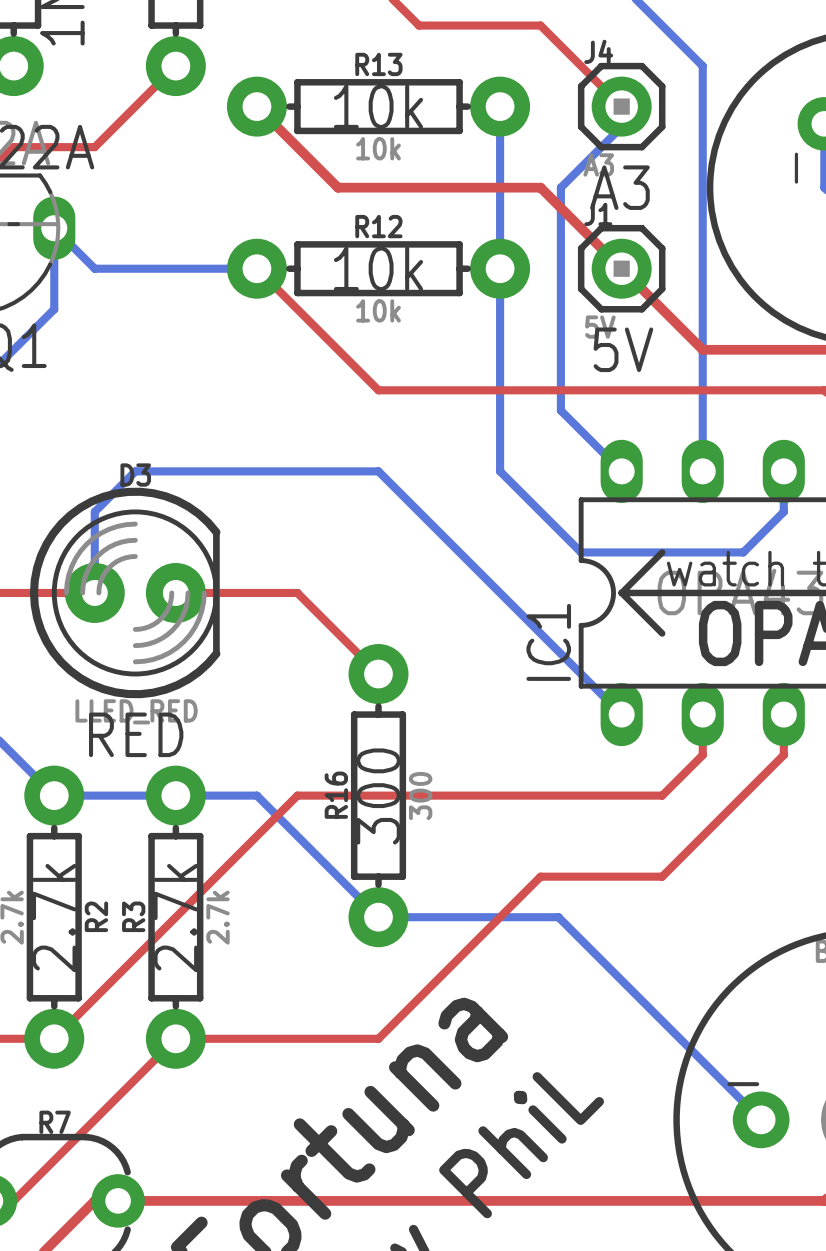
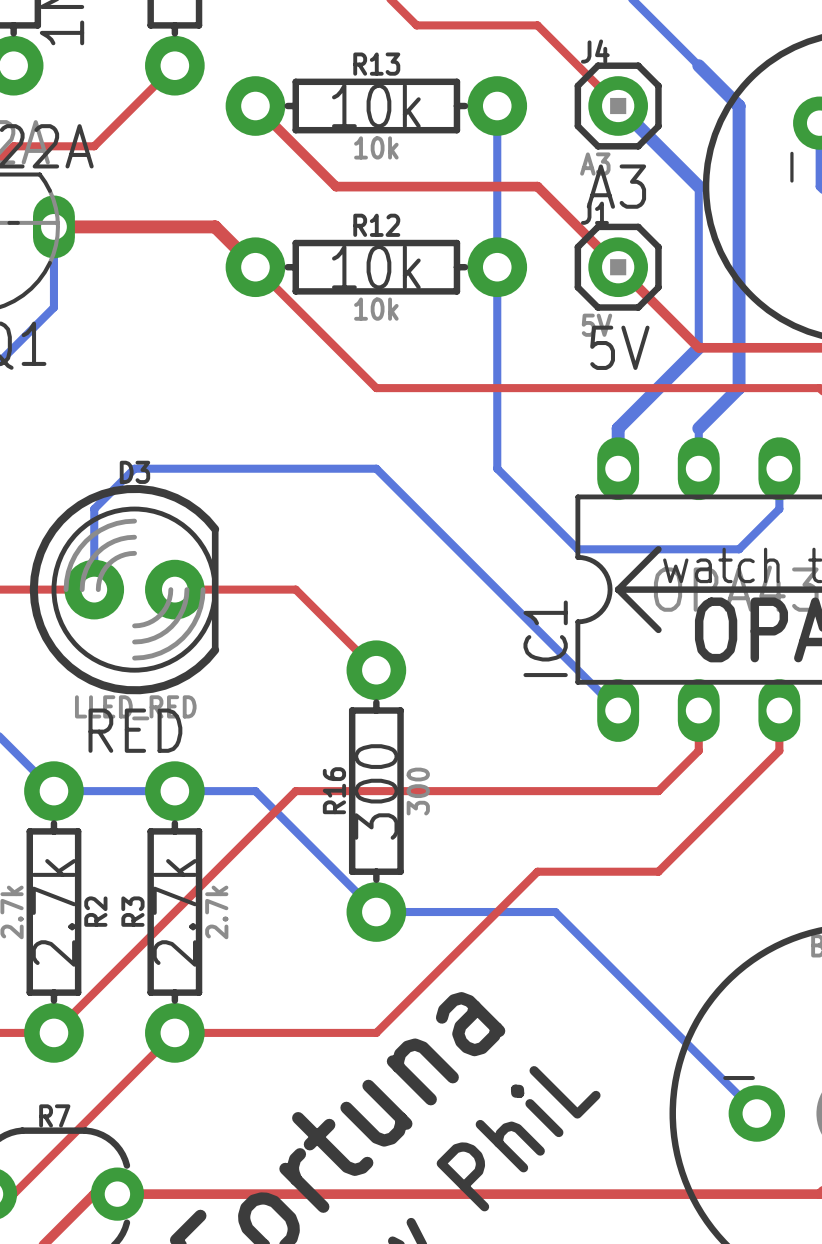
bottom track: (702, 66) (702, 187) -> (618, 106) (698, 186)
bottom track: none -> (698, 65) (739, 106) (739, 388) (698, 428)
bottom track: (621, 126) (560, 187) (560, 410) (621, 471) -> none
top track: none -> (53, 226) (215, 226) (255, 267)
bottom track: (54, 228) (94, 268) (256, 268) -> none
bottom track: (702, 349) (702, 430) -> (698, 347) (618, 428) (618, 468)

